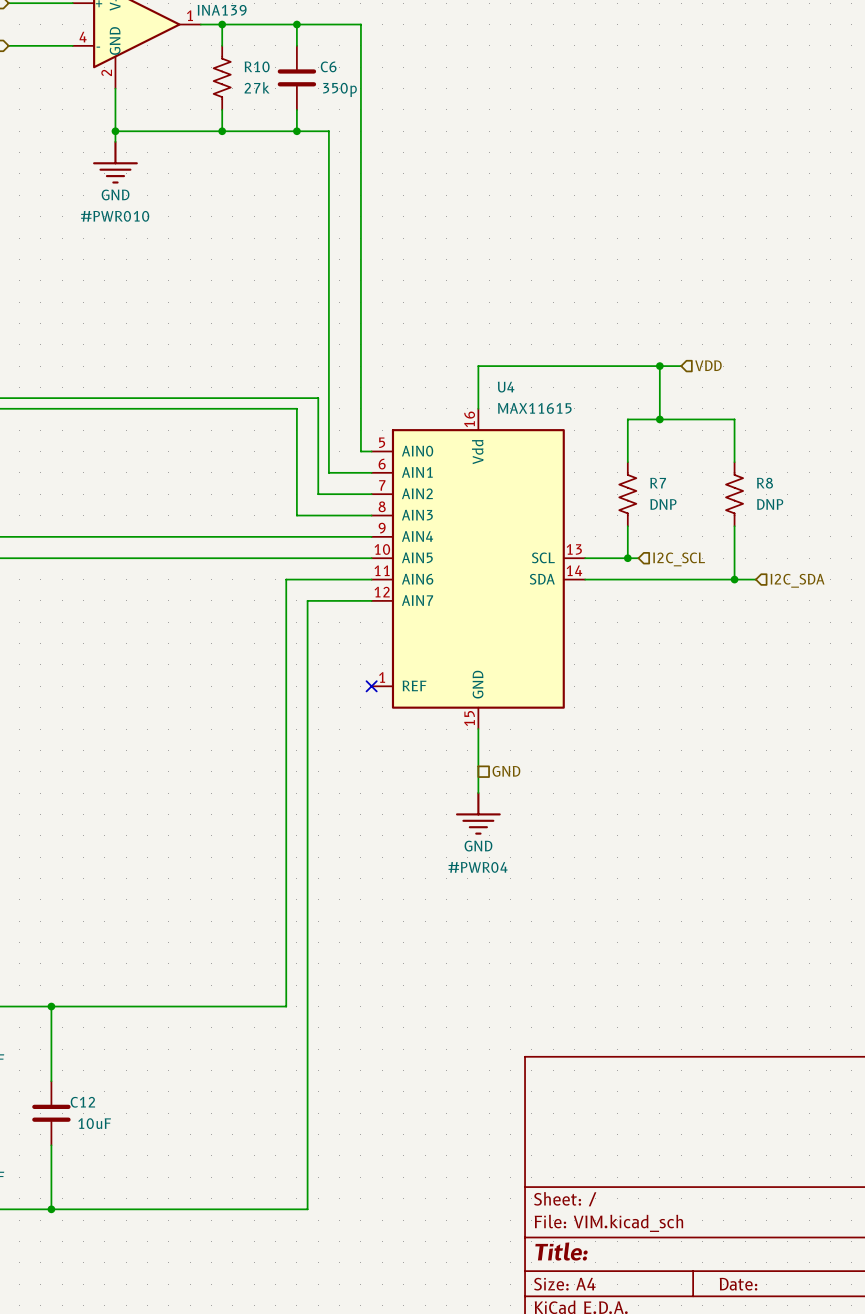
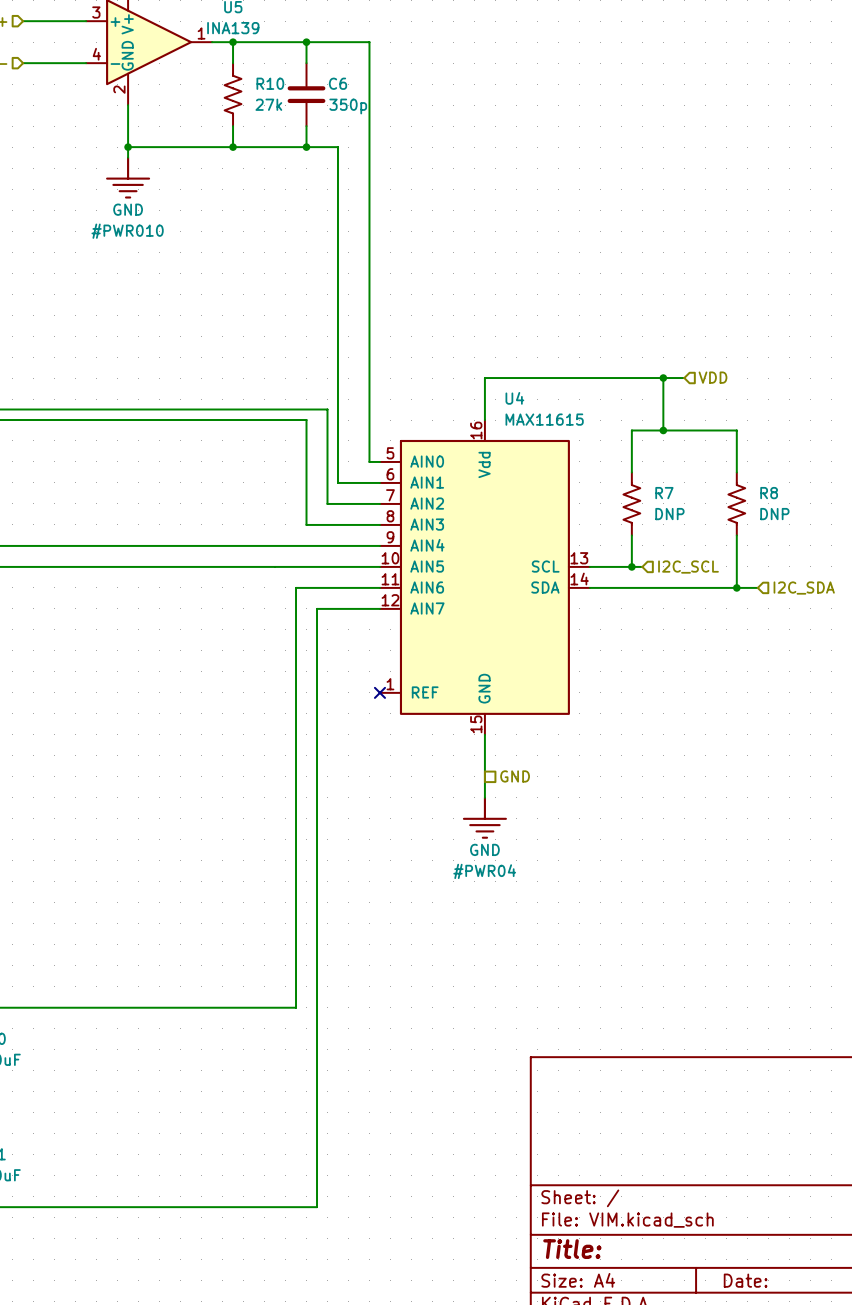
wire: (51, 1006) (51, 1081) -> none
junction: (51, 1006) -> none
C12: 10uF (51, 1113) -> none
wire: (51, 1145) (51, 1209) -> none
junction: (51, 1209) -> none

